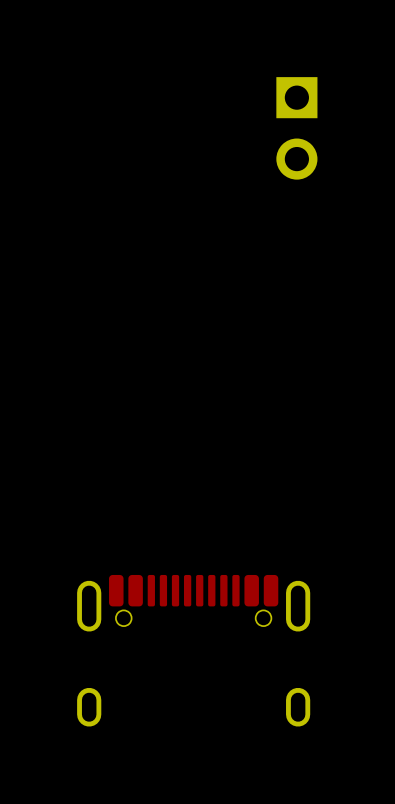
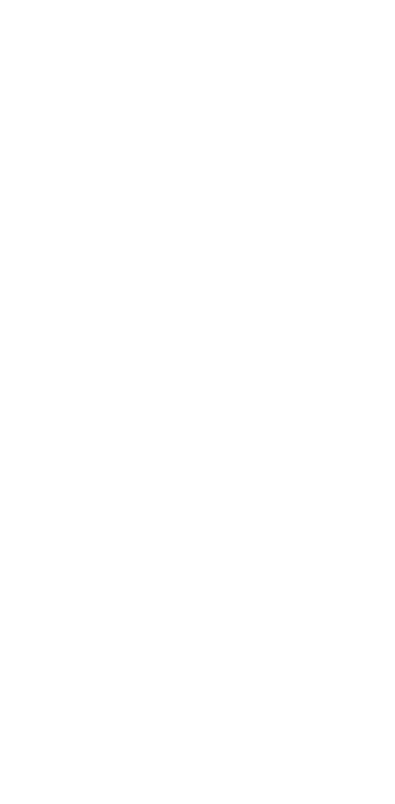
part: (296, 128) -> none
part: (193, 650) -> none

